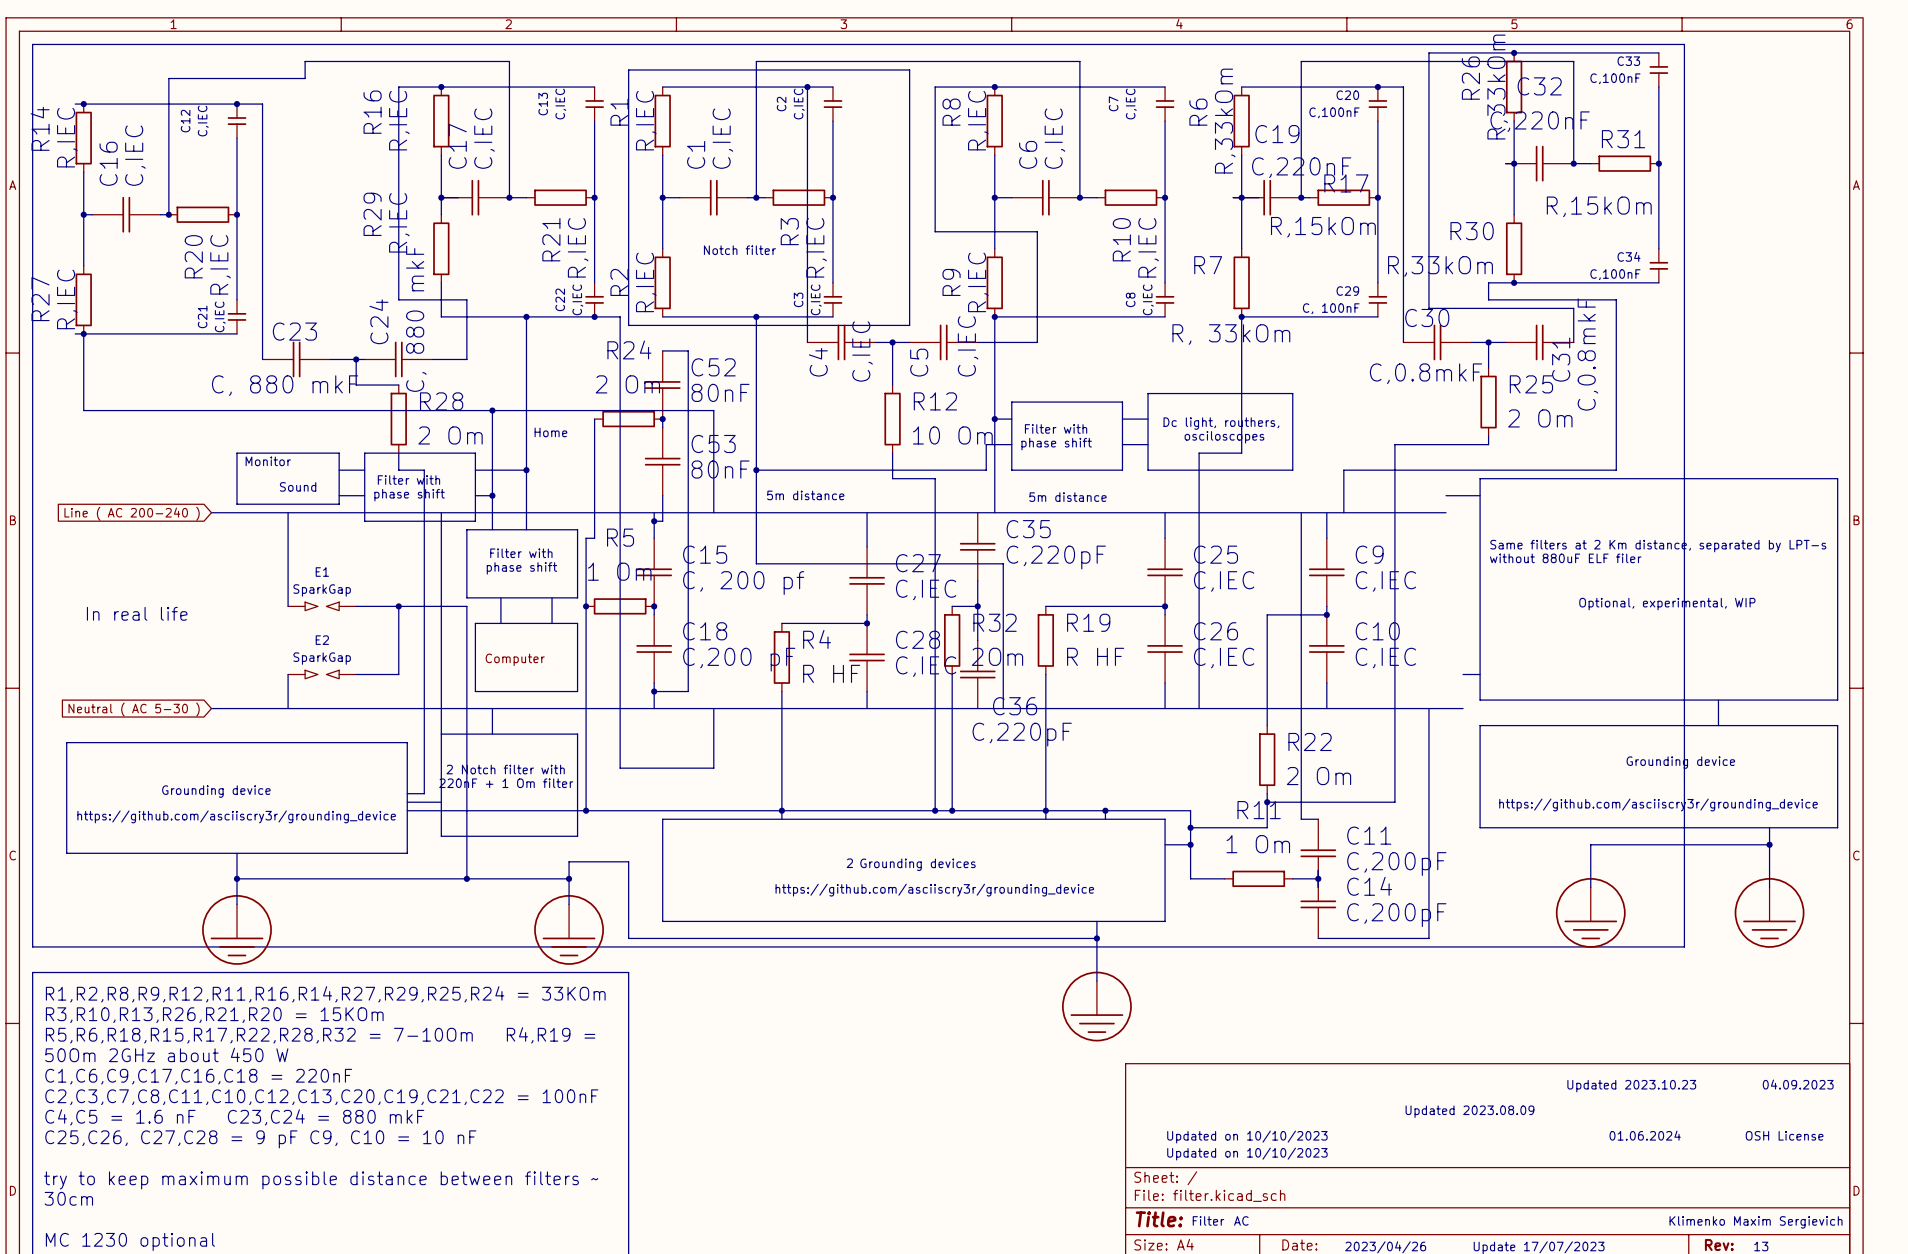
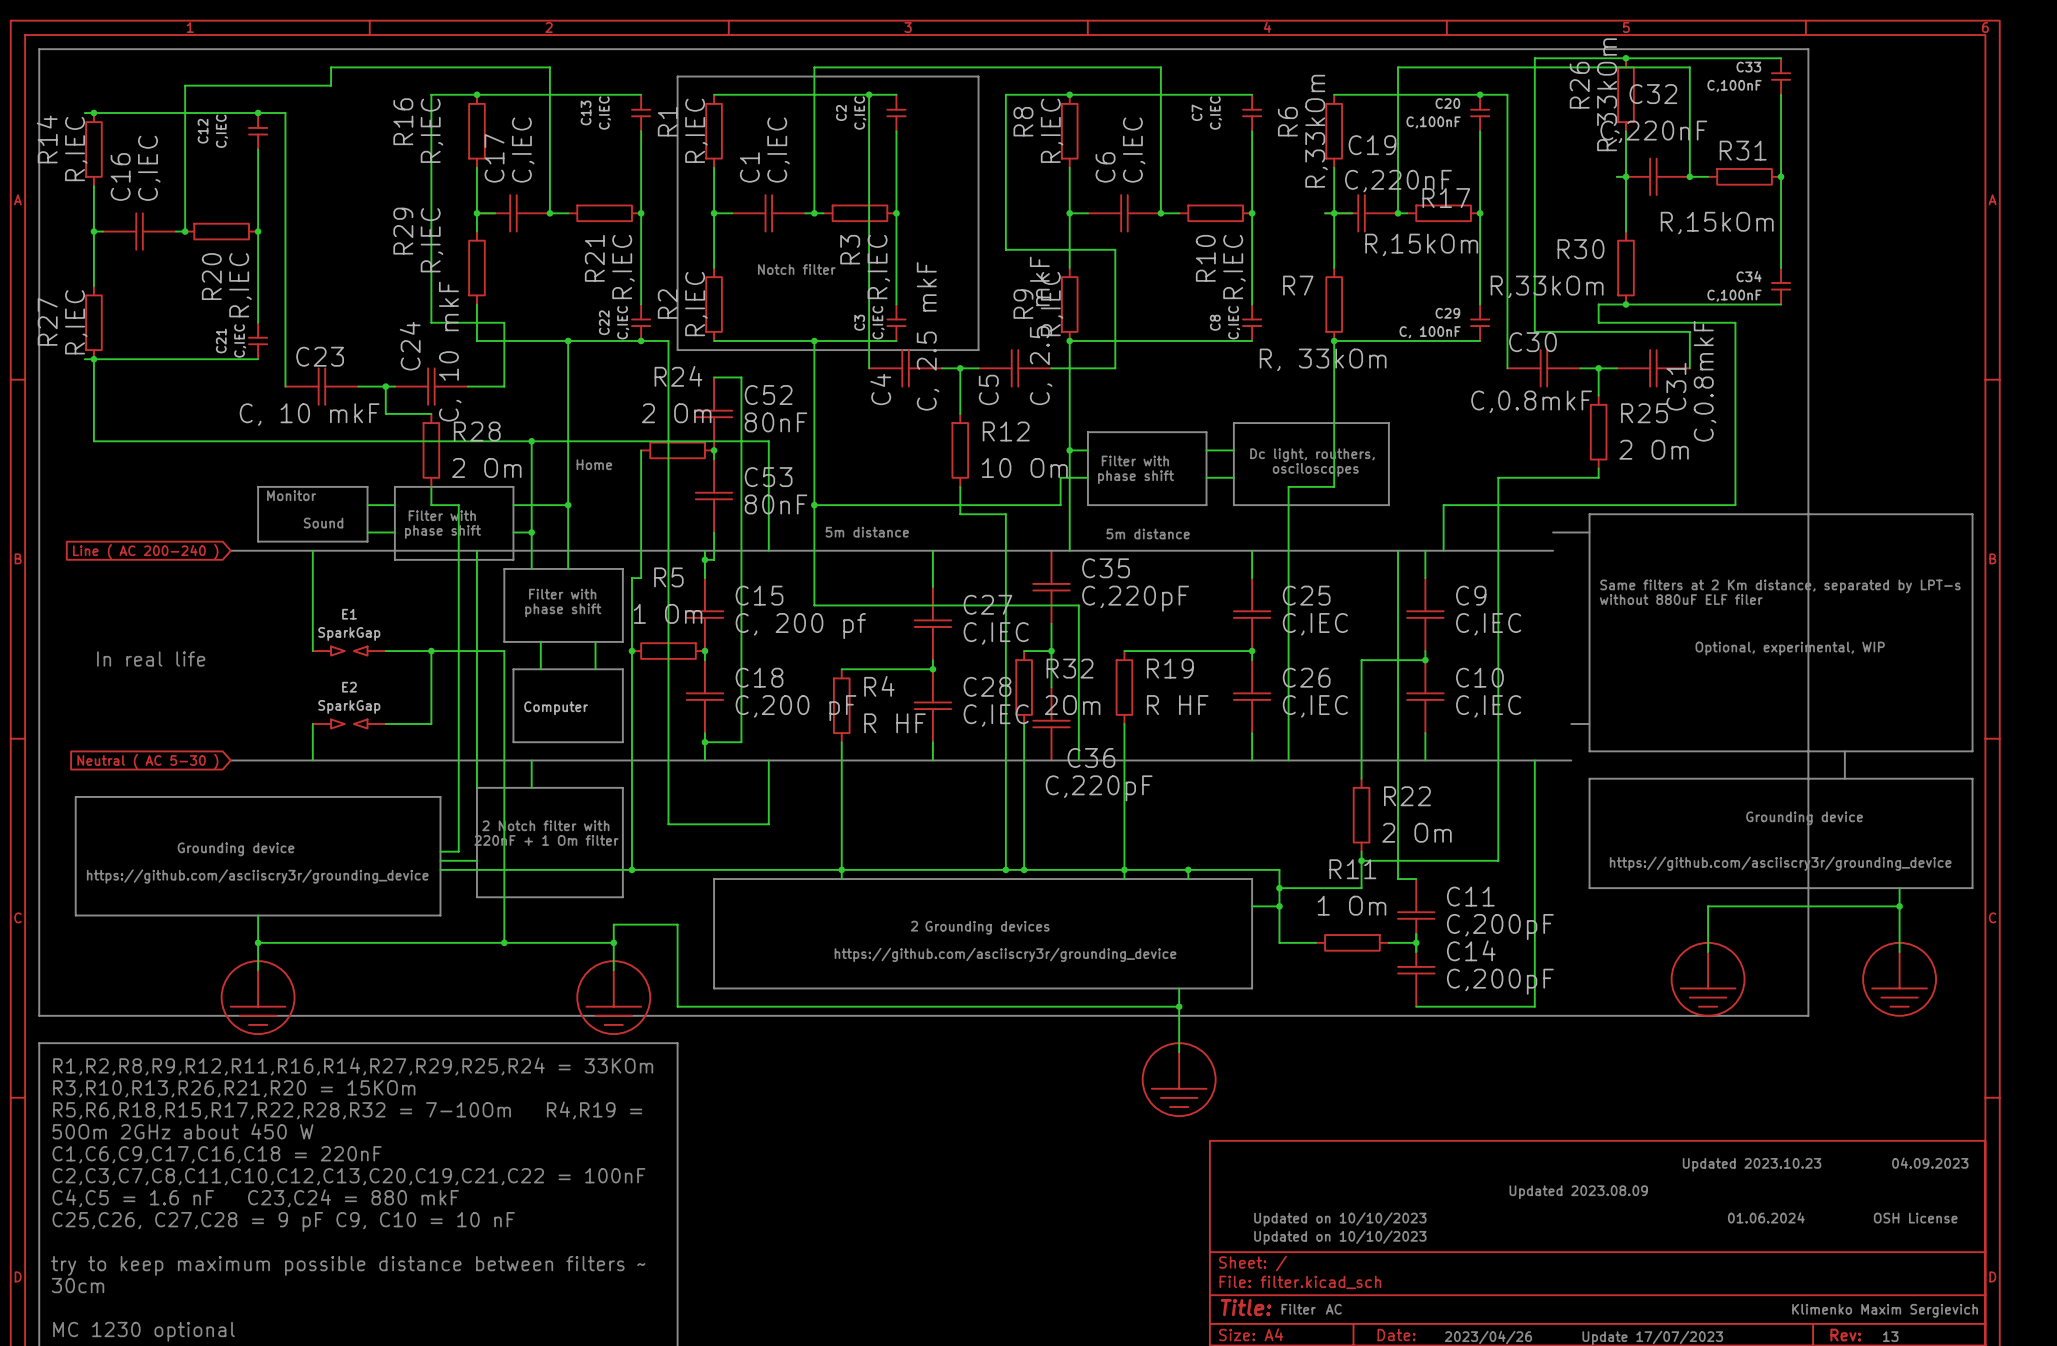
C24 value: C, 880 mkF (416, 318) -> C, 10 mkF (450, 351)
C5 value: C,IEC (968, 346) -> C, 2.5 mkF (1041, 330)
C4 value: C,IEC (862, 351) -> C, 2.5 mkF (928, 336)
C23 value: C, 880 mkF (285, 385) -> C, 10 mkF (309, 414)

